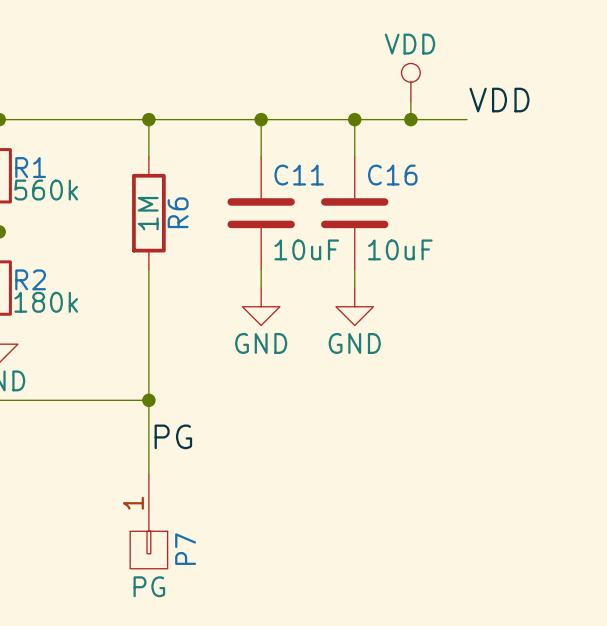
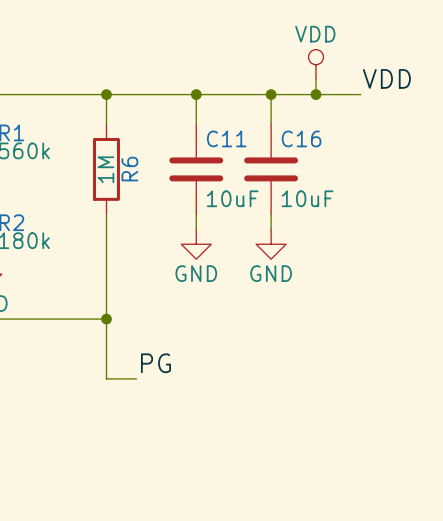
label position: PG (173, 436) -> PG (155, 363)
wire: none -> (106, 378) (136, 378)
P7: PG (148, 521) -> none

